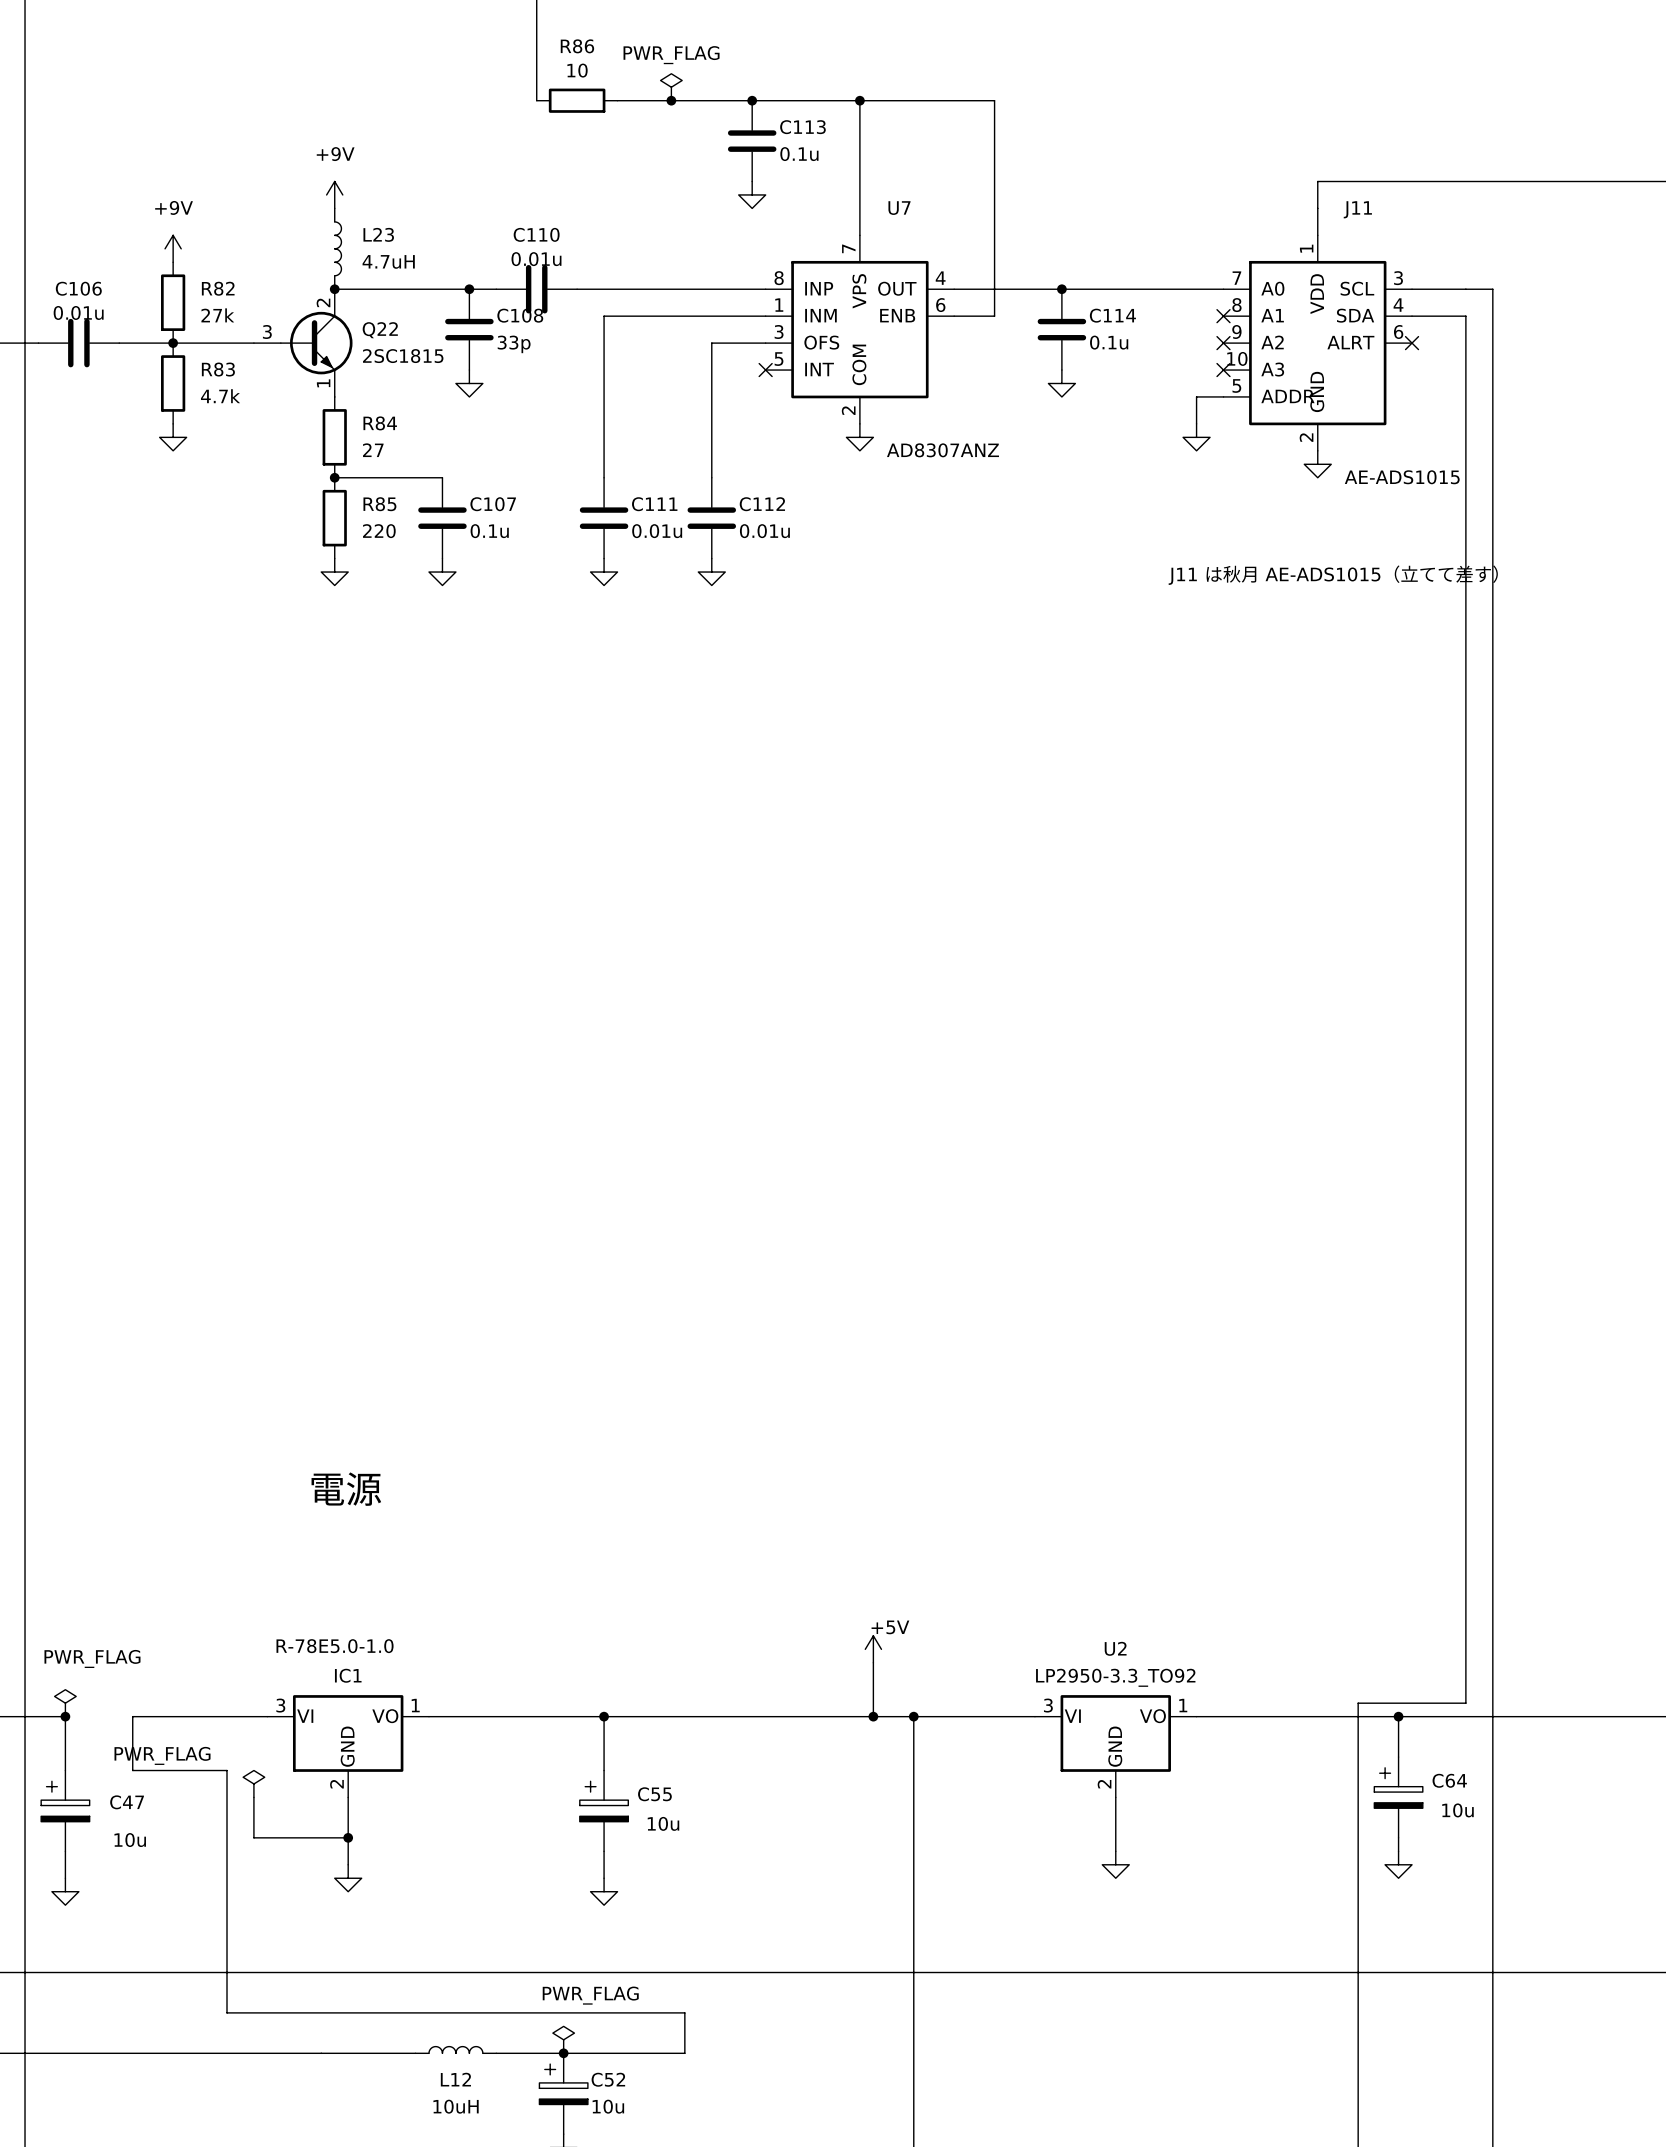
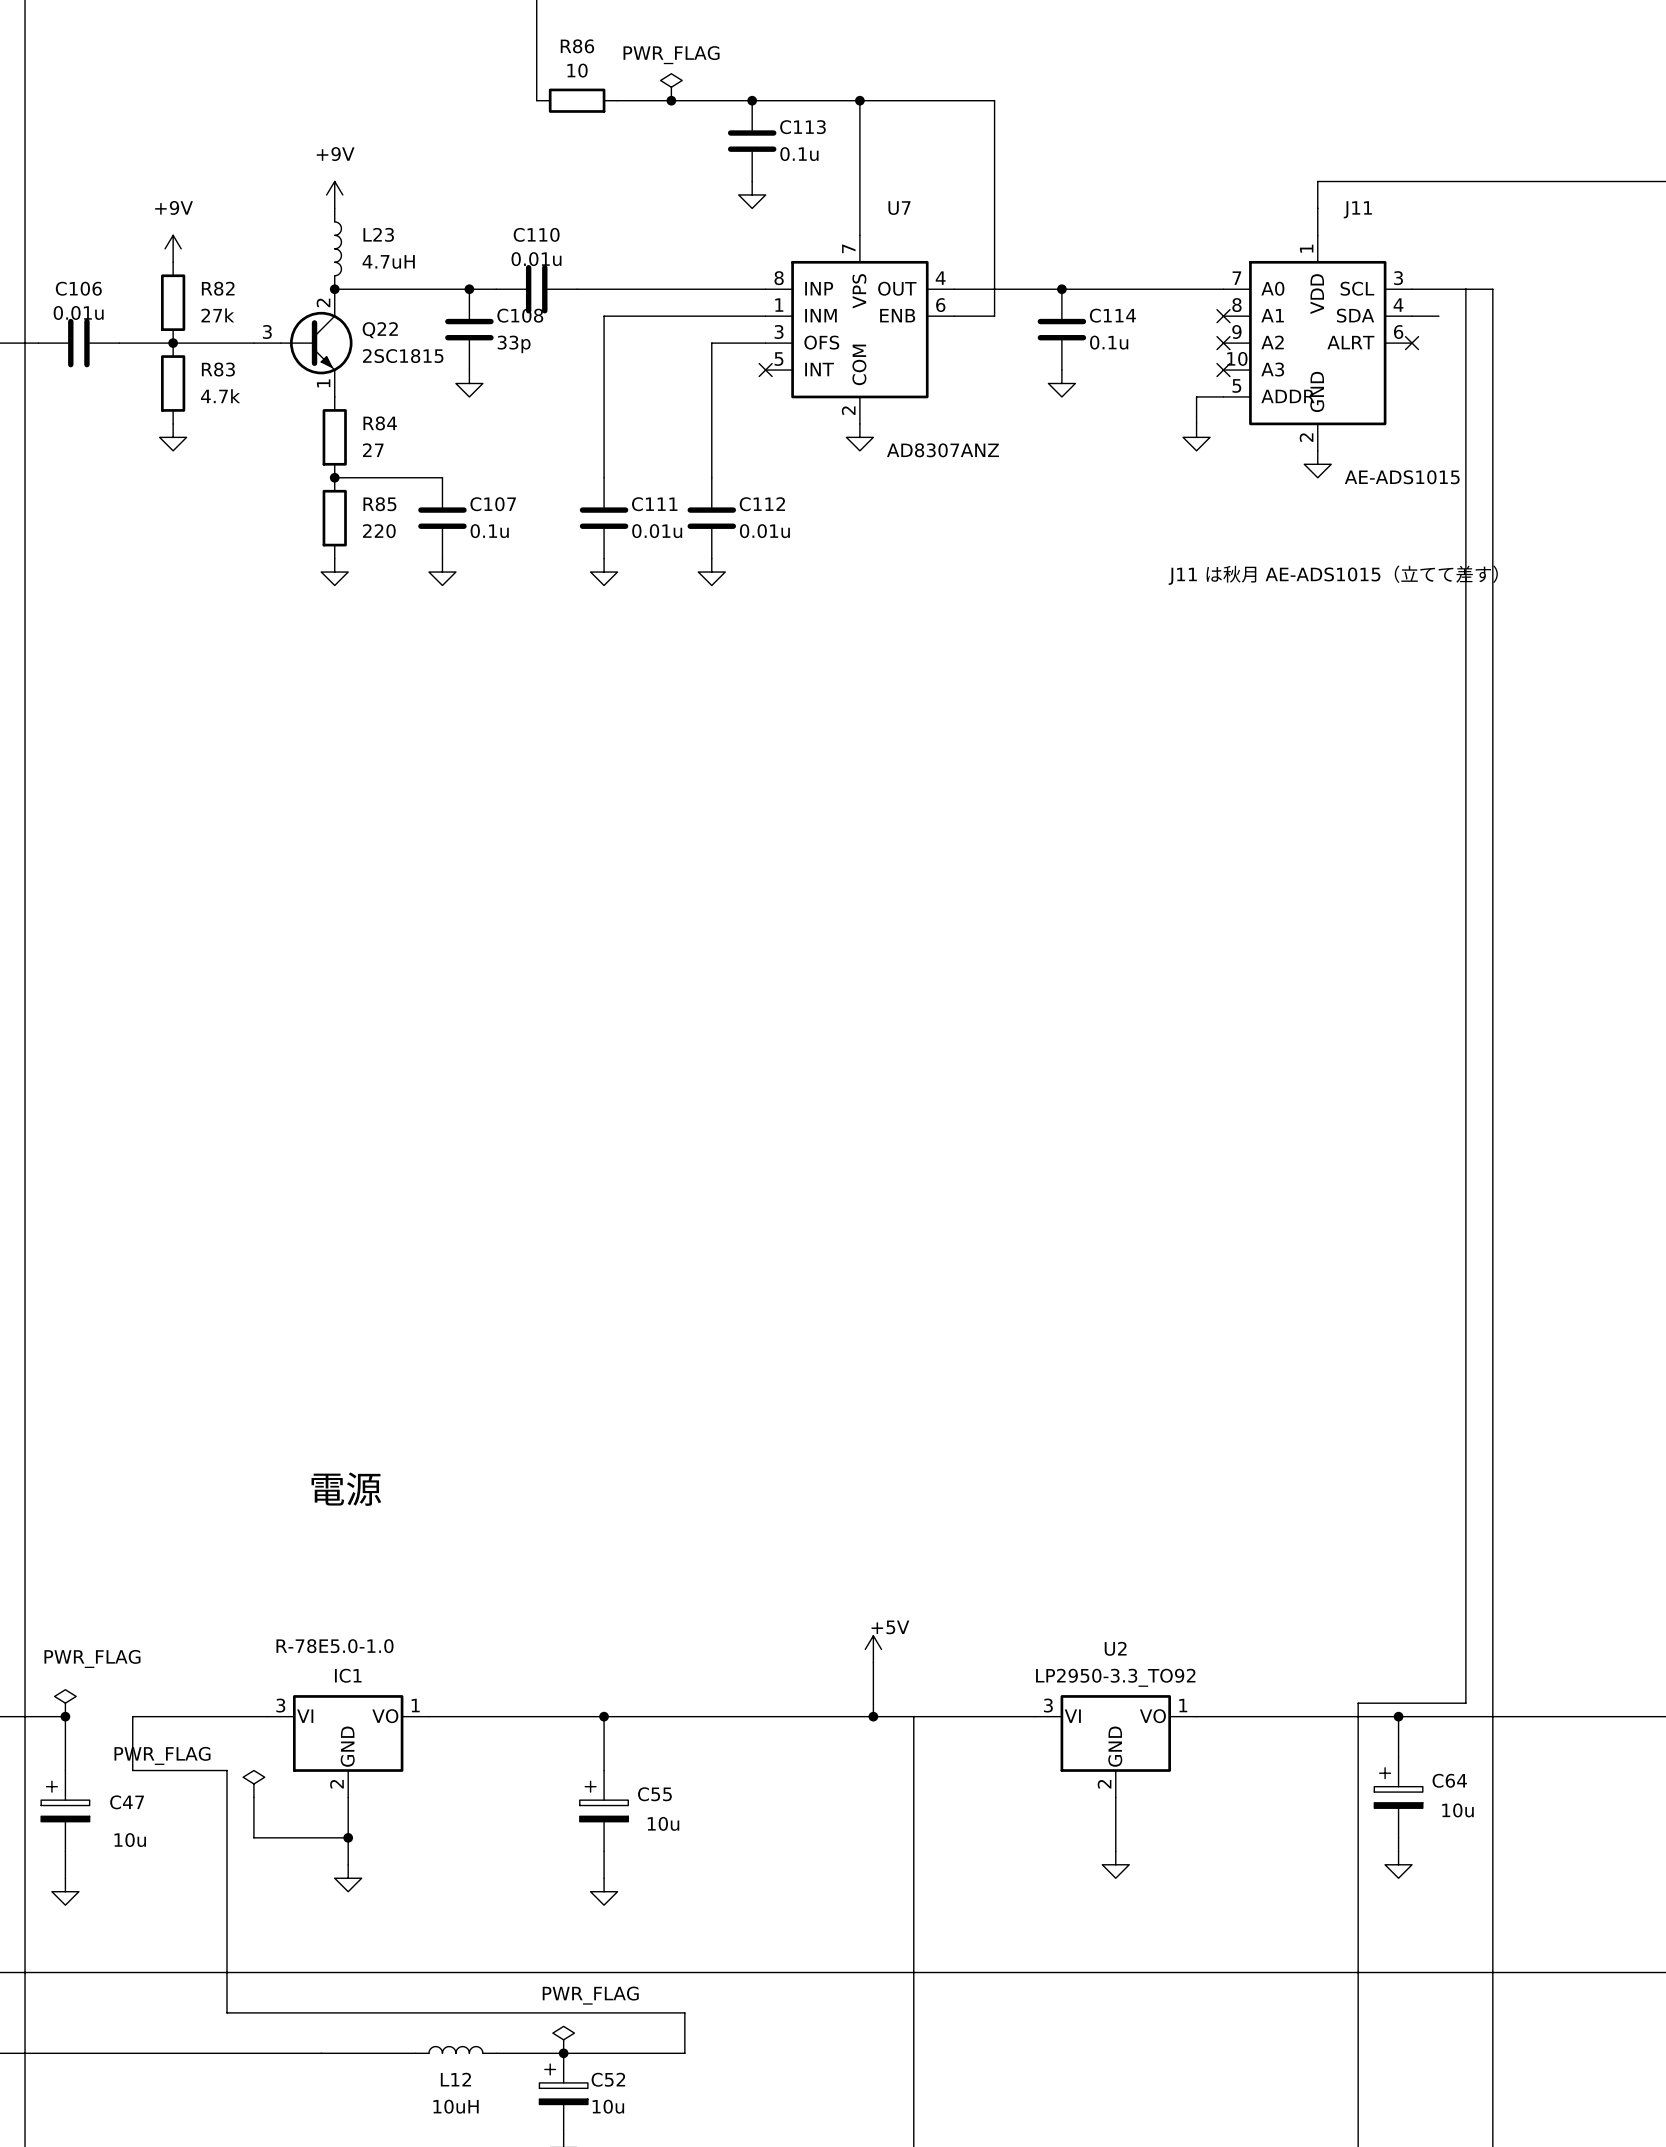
wire: (1438, 316) (1465, 316) -> (1465, 289) (1465, 316)
junction: (913, 1716) -> none

